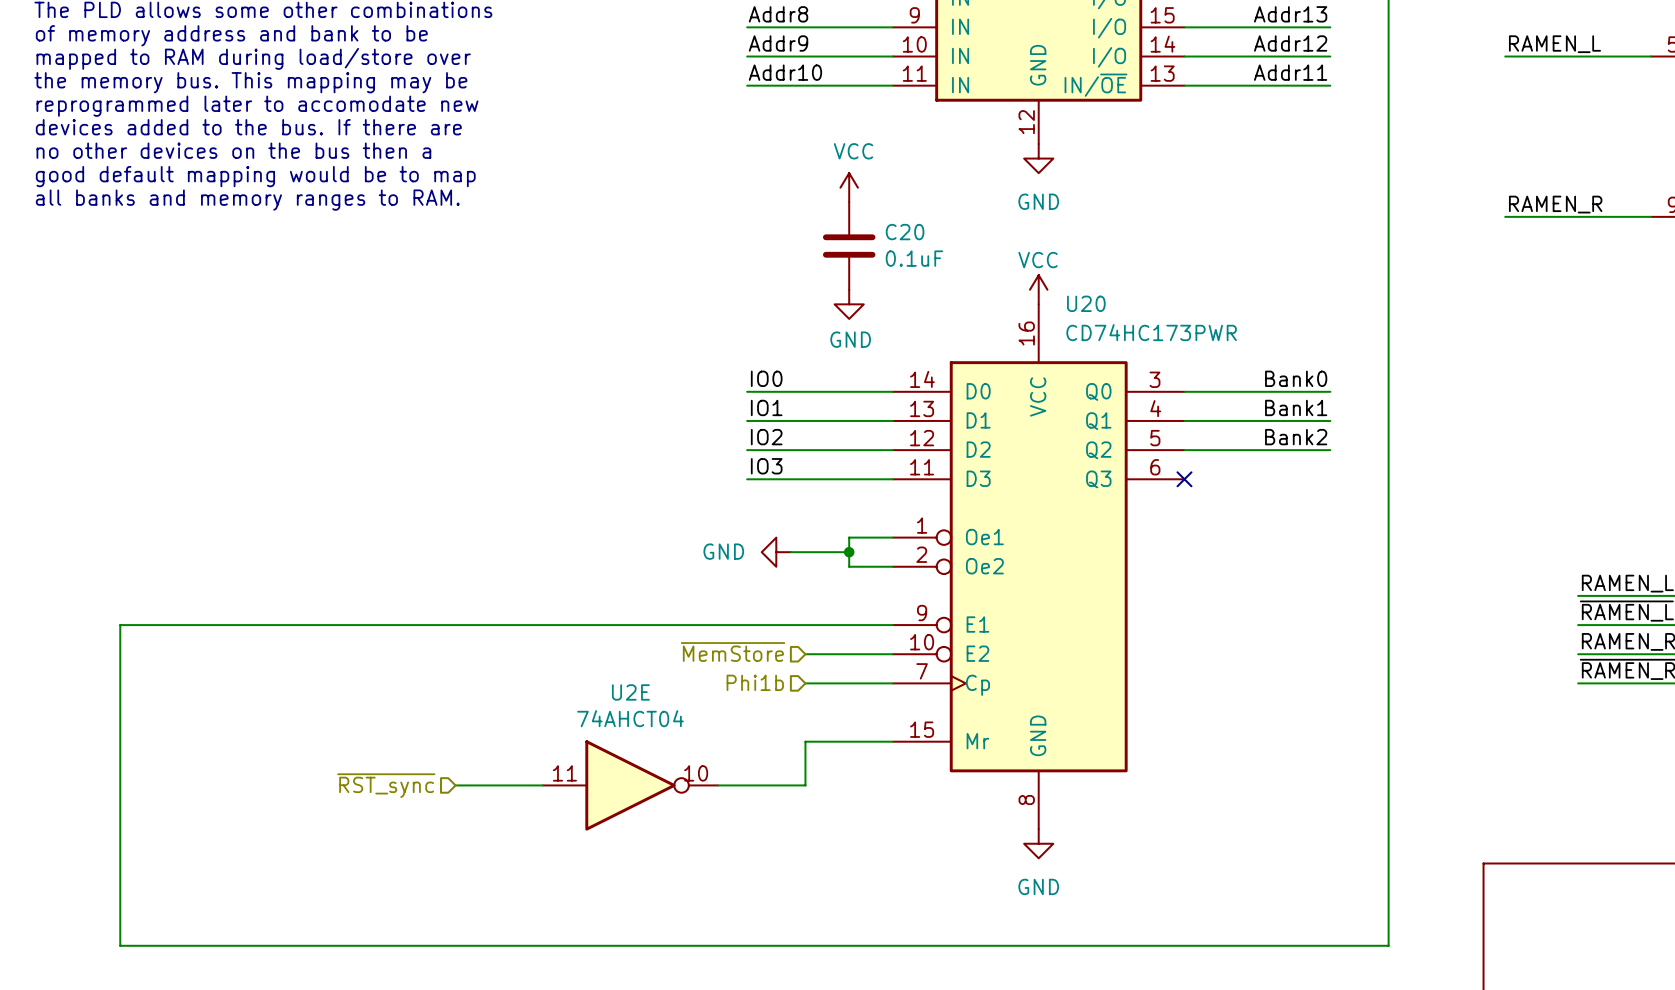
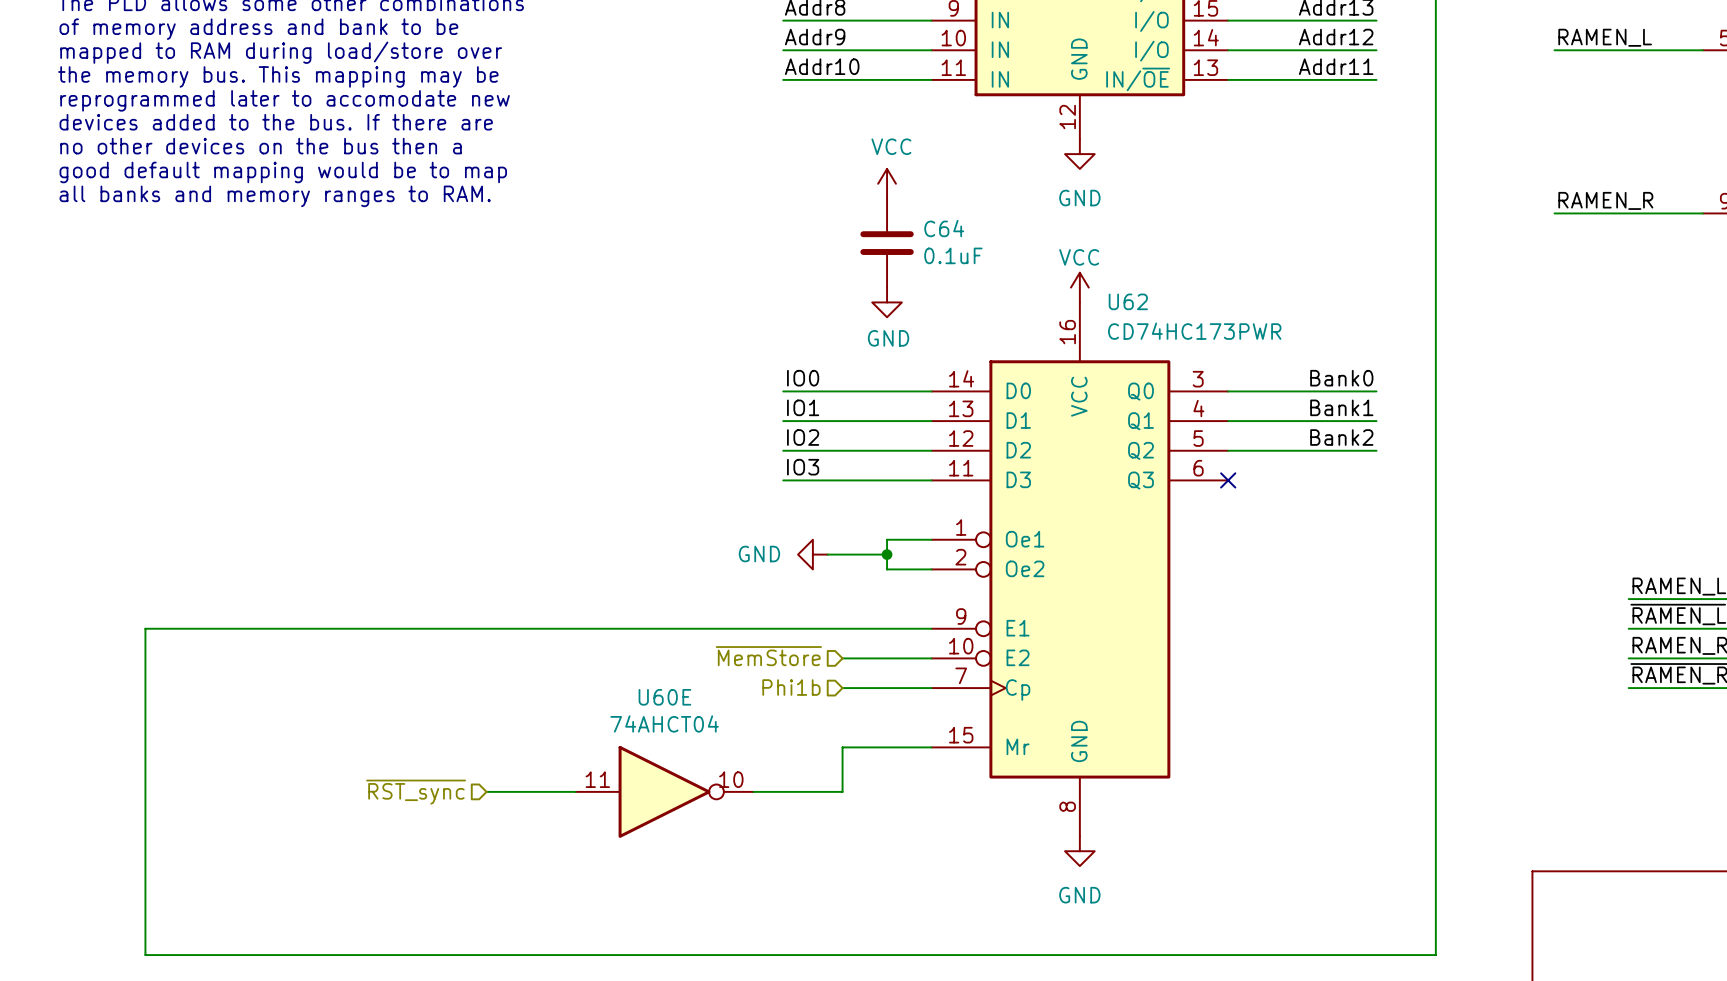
C20 name: C20 (905, 232) -> C64 (944, 228)
U20 name: U20 (1086, 303) -> U62 (1128, 301)
U2E name: U2E (630, 692) -> U60E (664, 697)

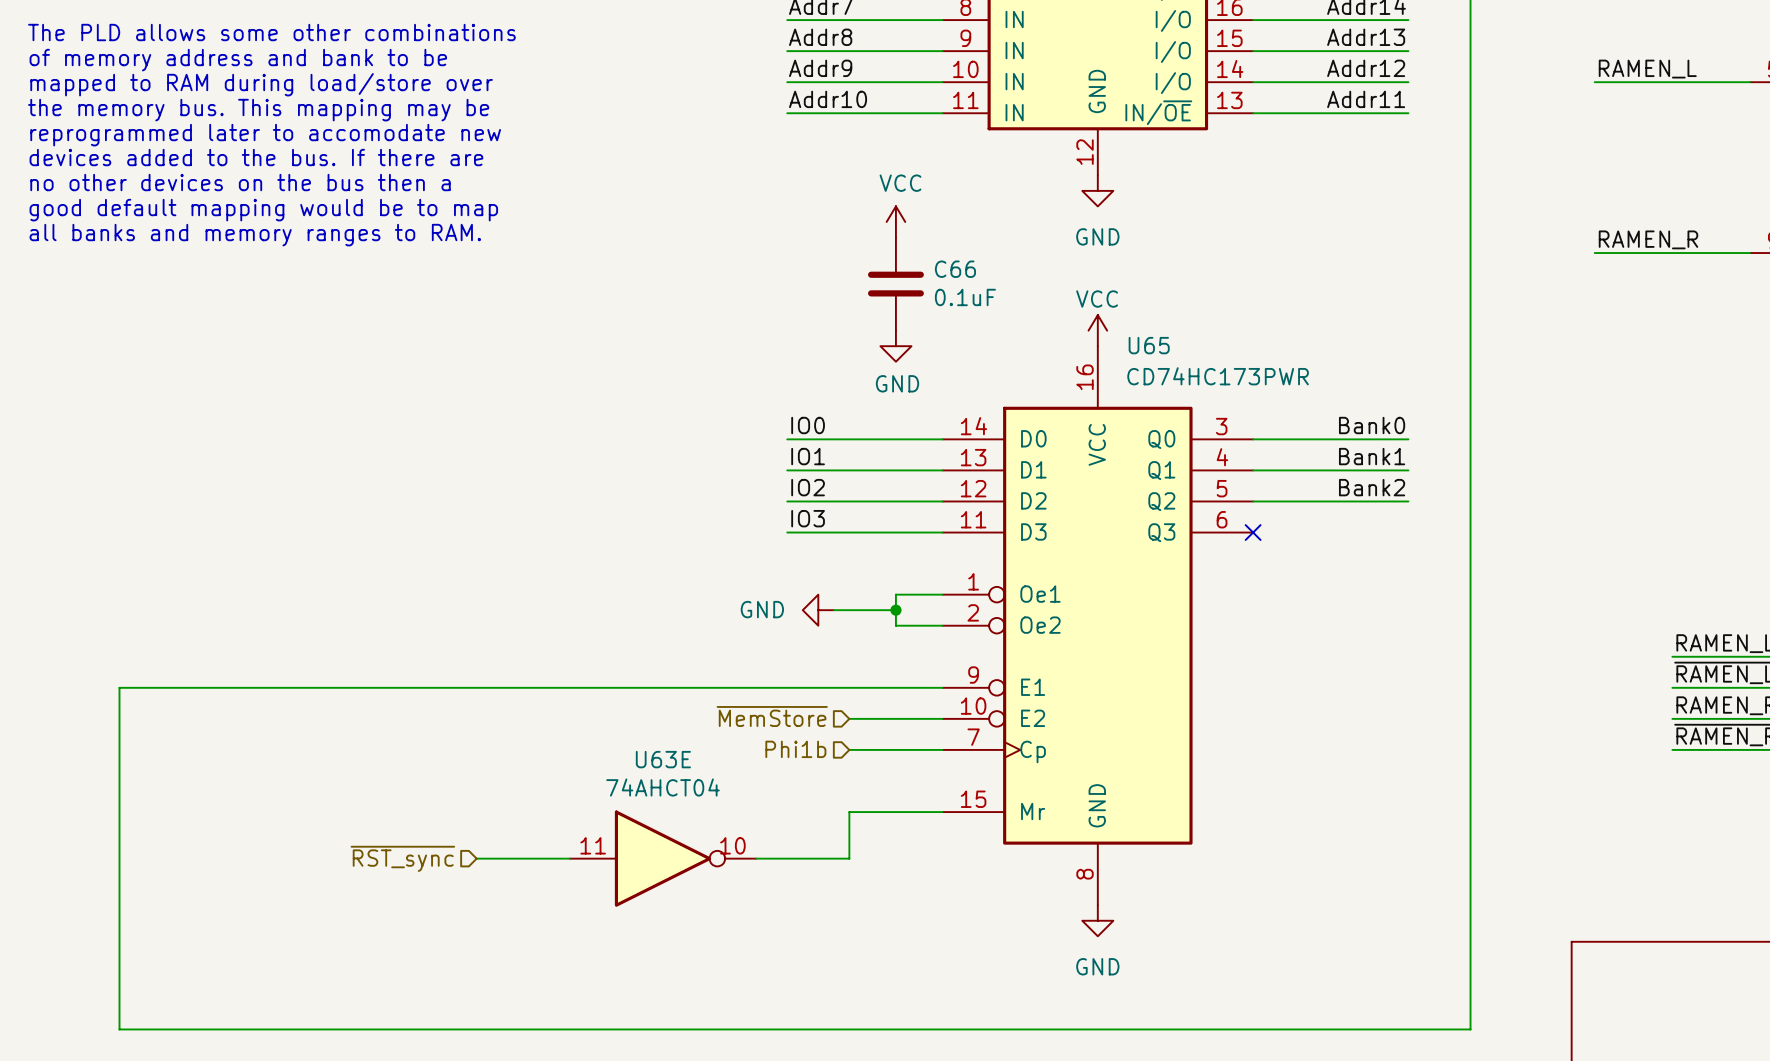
C64 name: C64 (944, 228) -> C66 (955, 269)
U62 name: U62 (1128, 301) -> U65 (1149, 345)
U60E name: U60E (664, 697) -> U63E (663, 759)

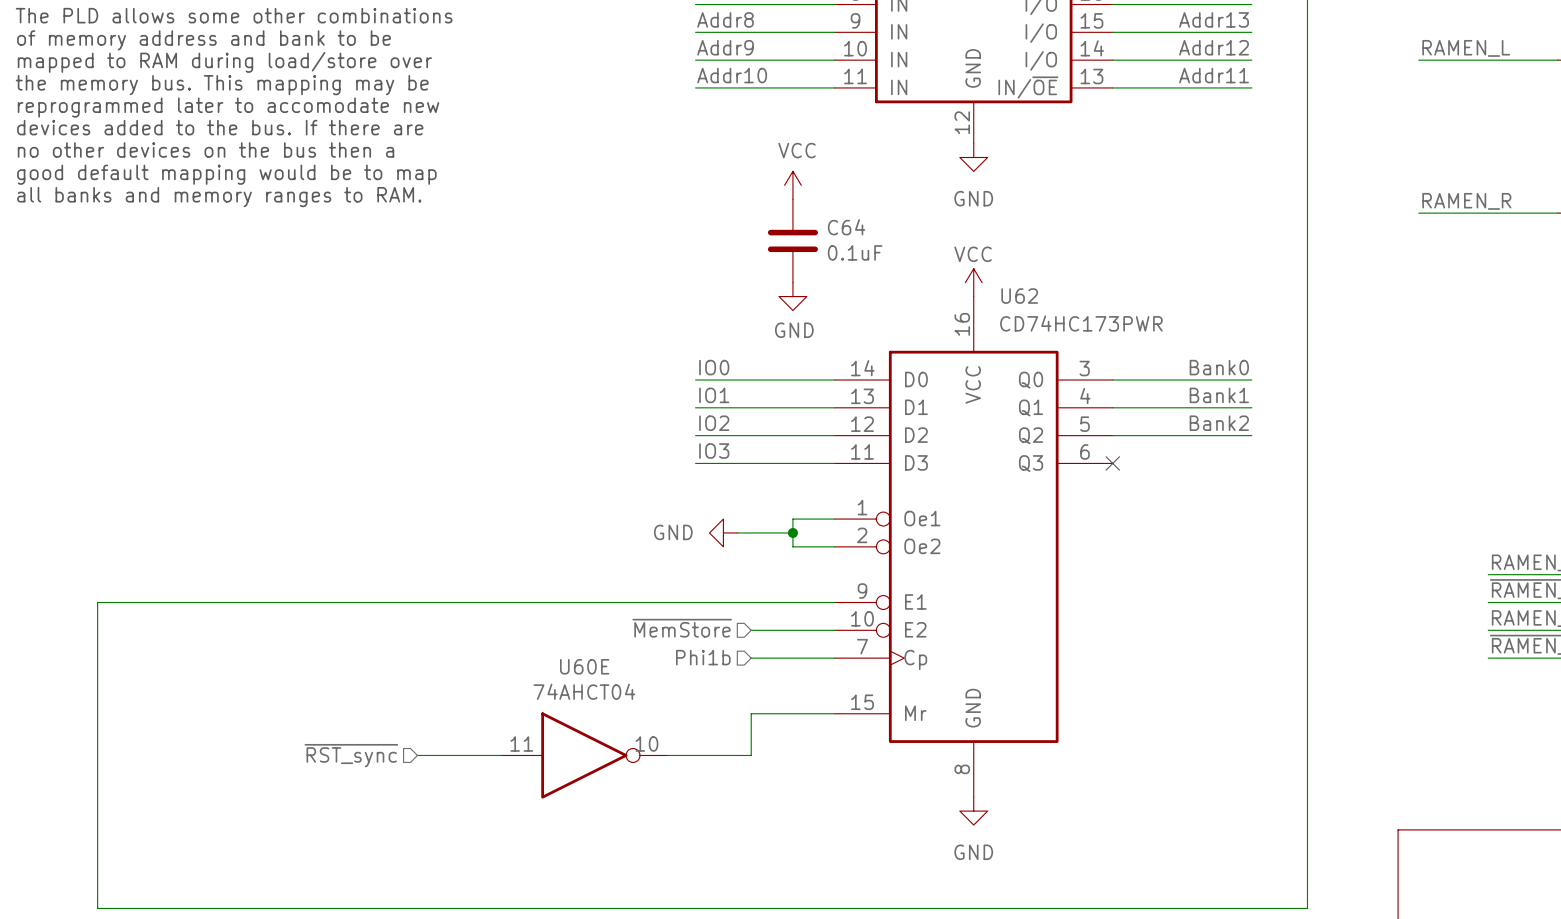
C66 name: C66 (955, 269) -> C64 (846, 227)
U65 name: U65 (1149, 345) -> U62 (1019, 296)
U63E name: U63E (663, 759) -> U60E (584, 666)

